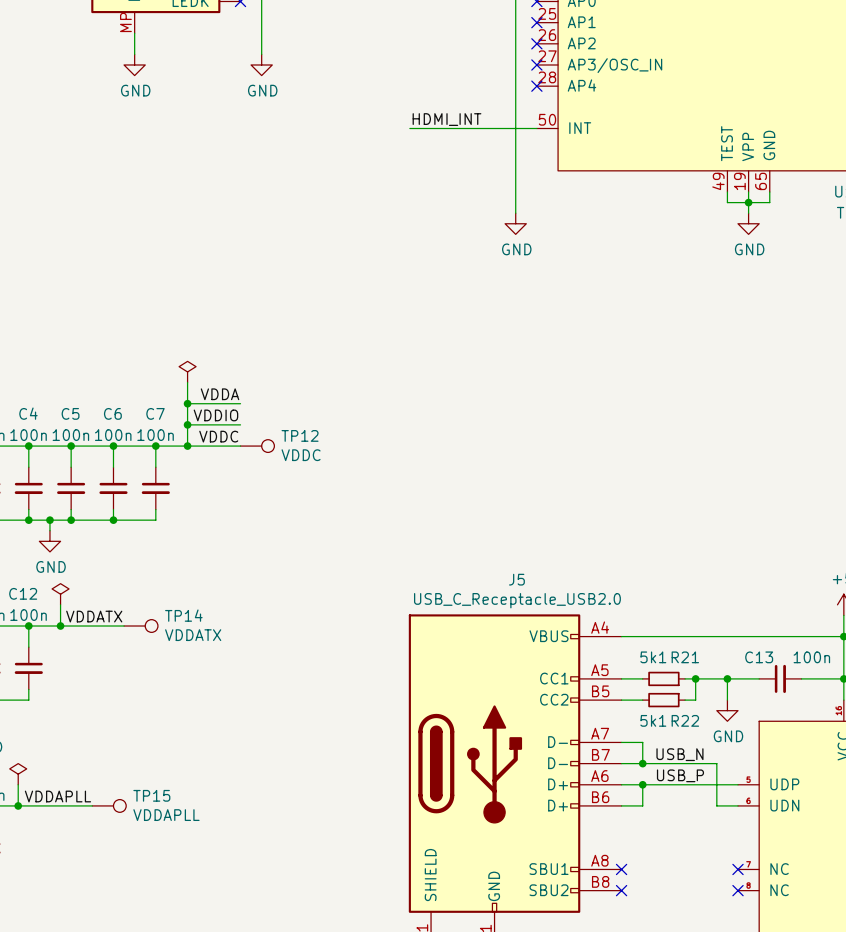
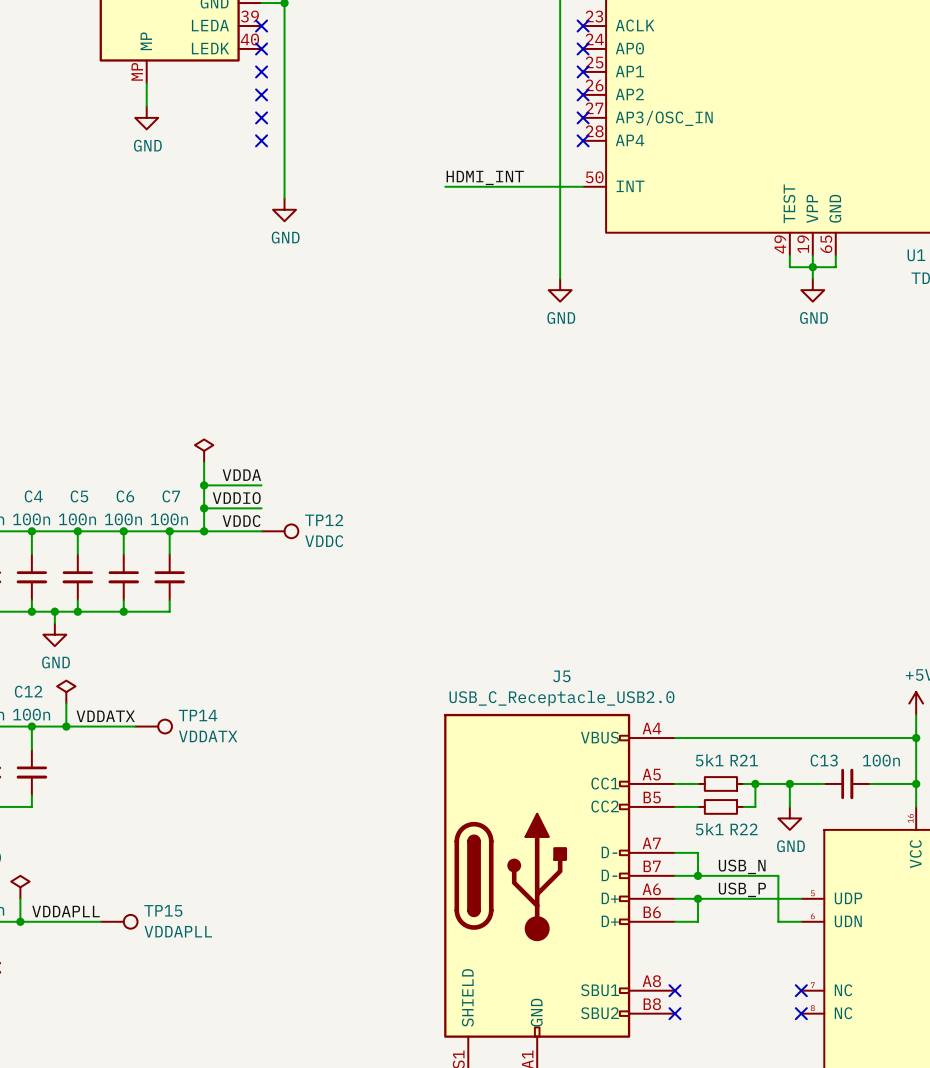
no-connect mark: none -> (261, 71)
no-connect mark: none -> (261, 94)
wire: none -> (284, 106) (284, 198)
no-connect mark: none -> (261, 117)
power symbol position: GND (261, 64) -> GND (284, 209)
no-connect mark: none -> (261, 140)

